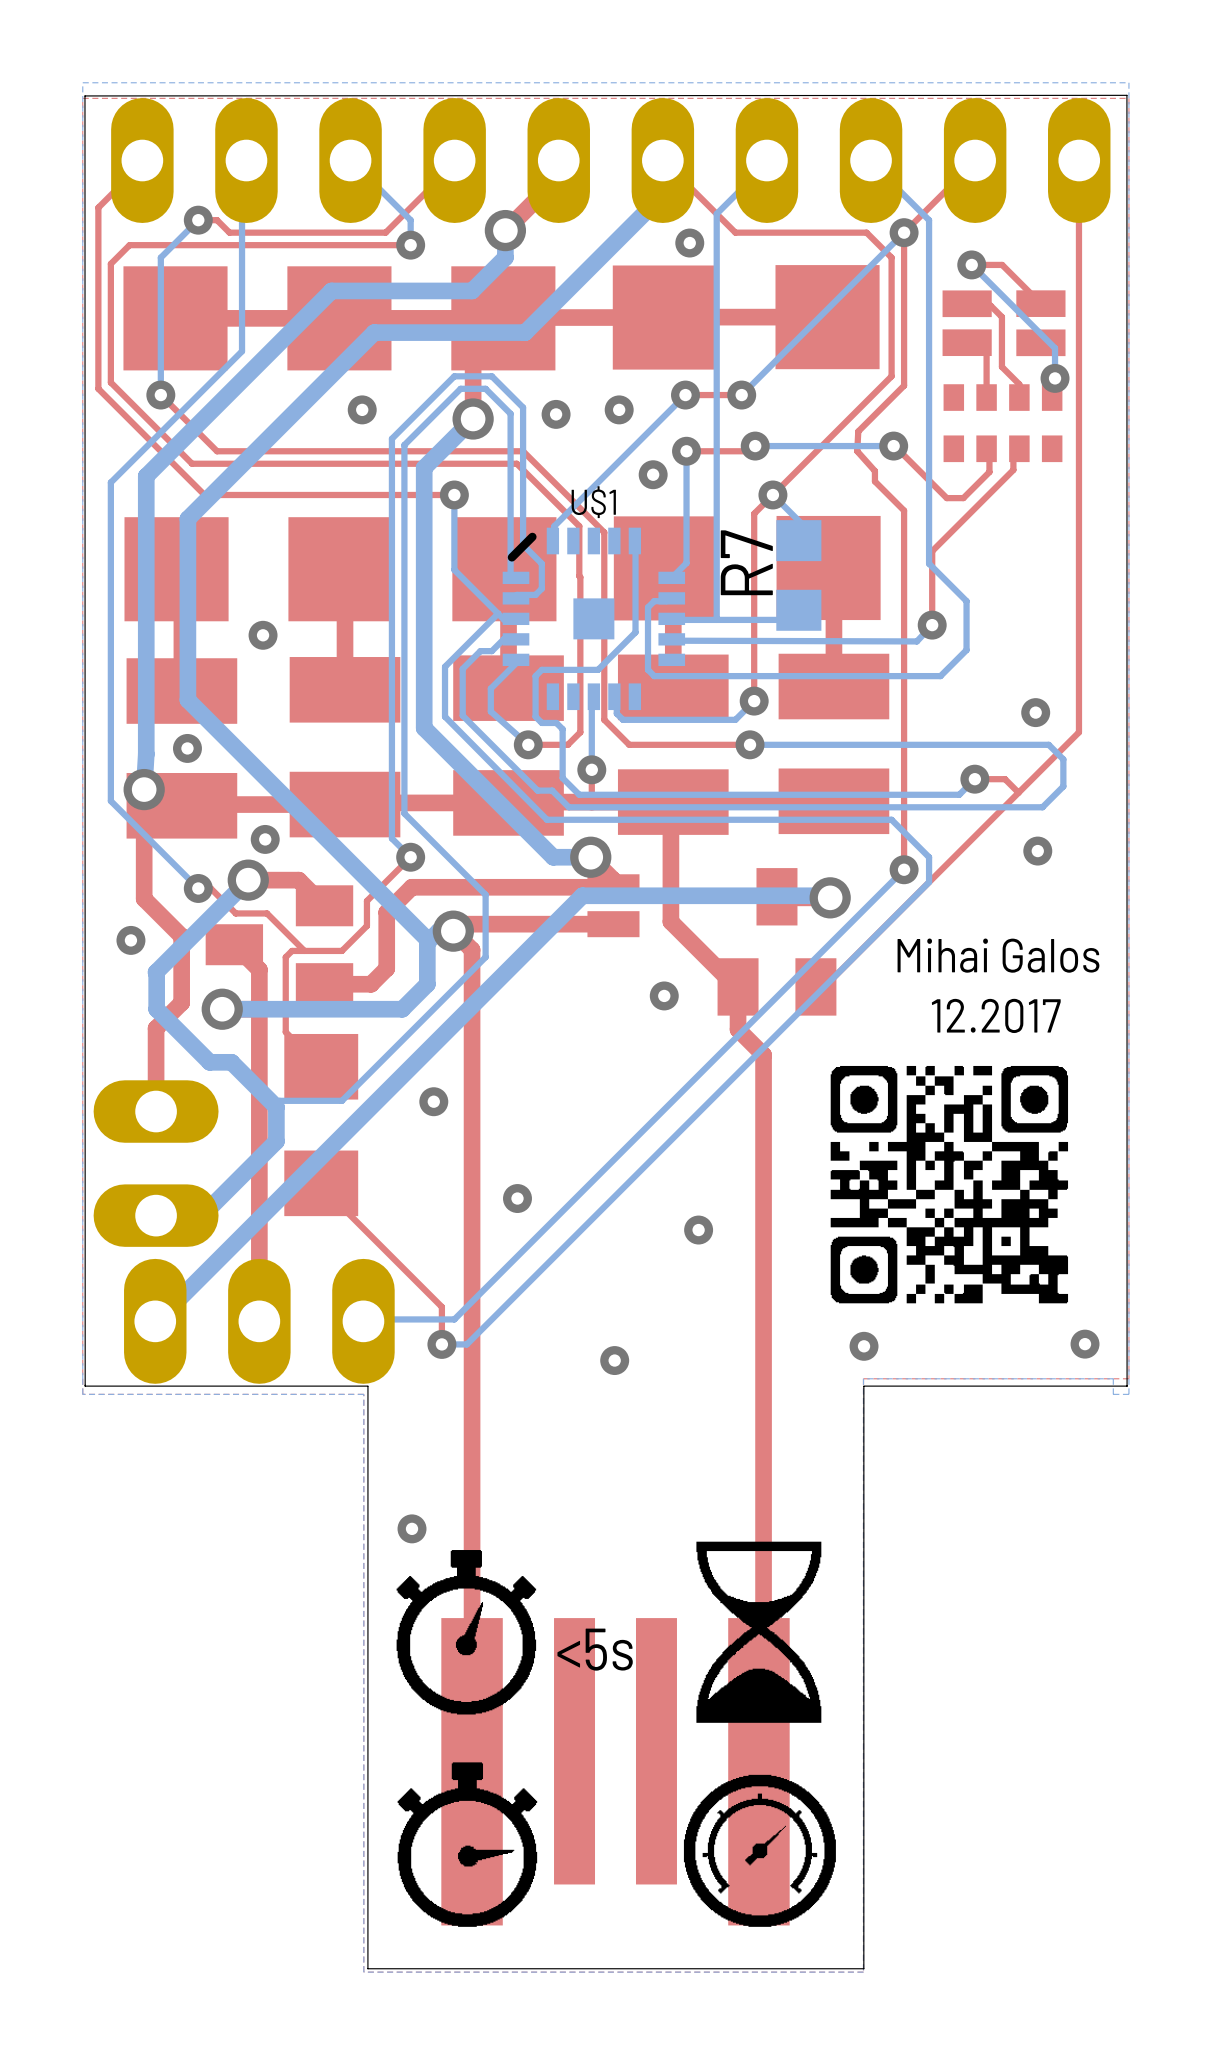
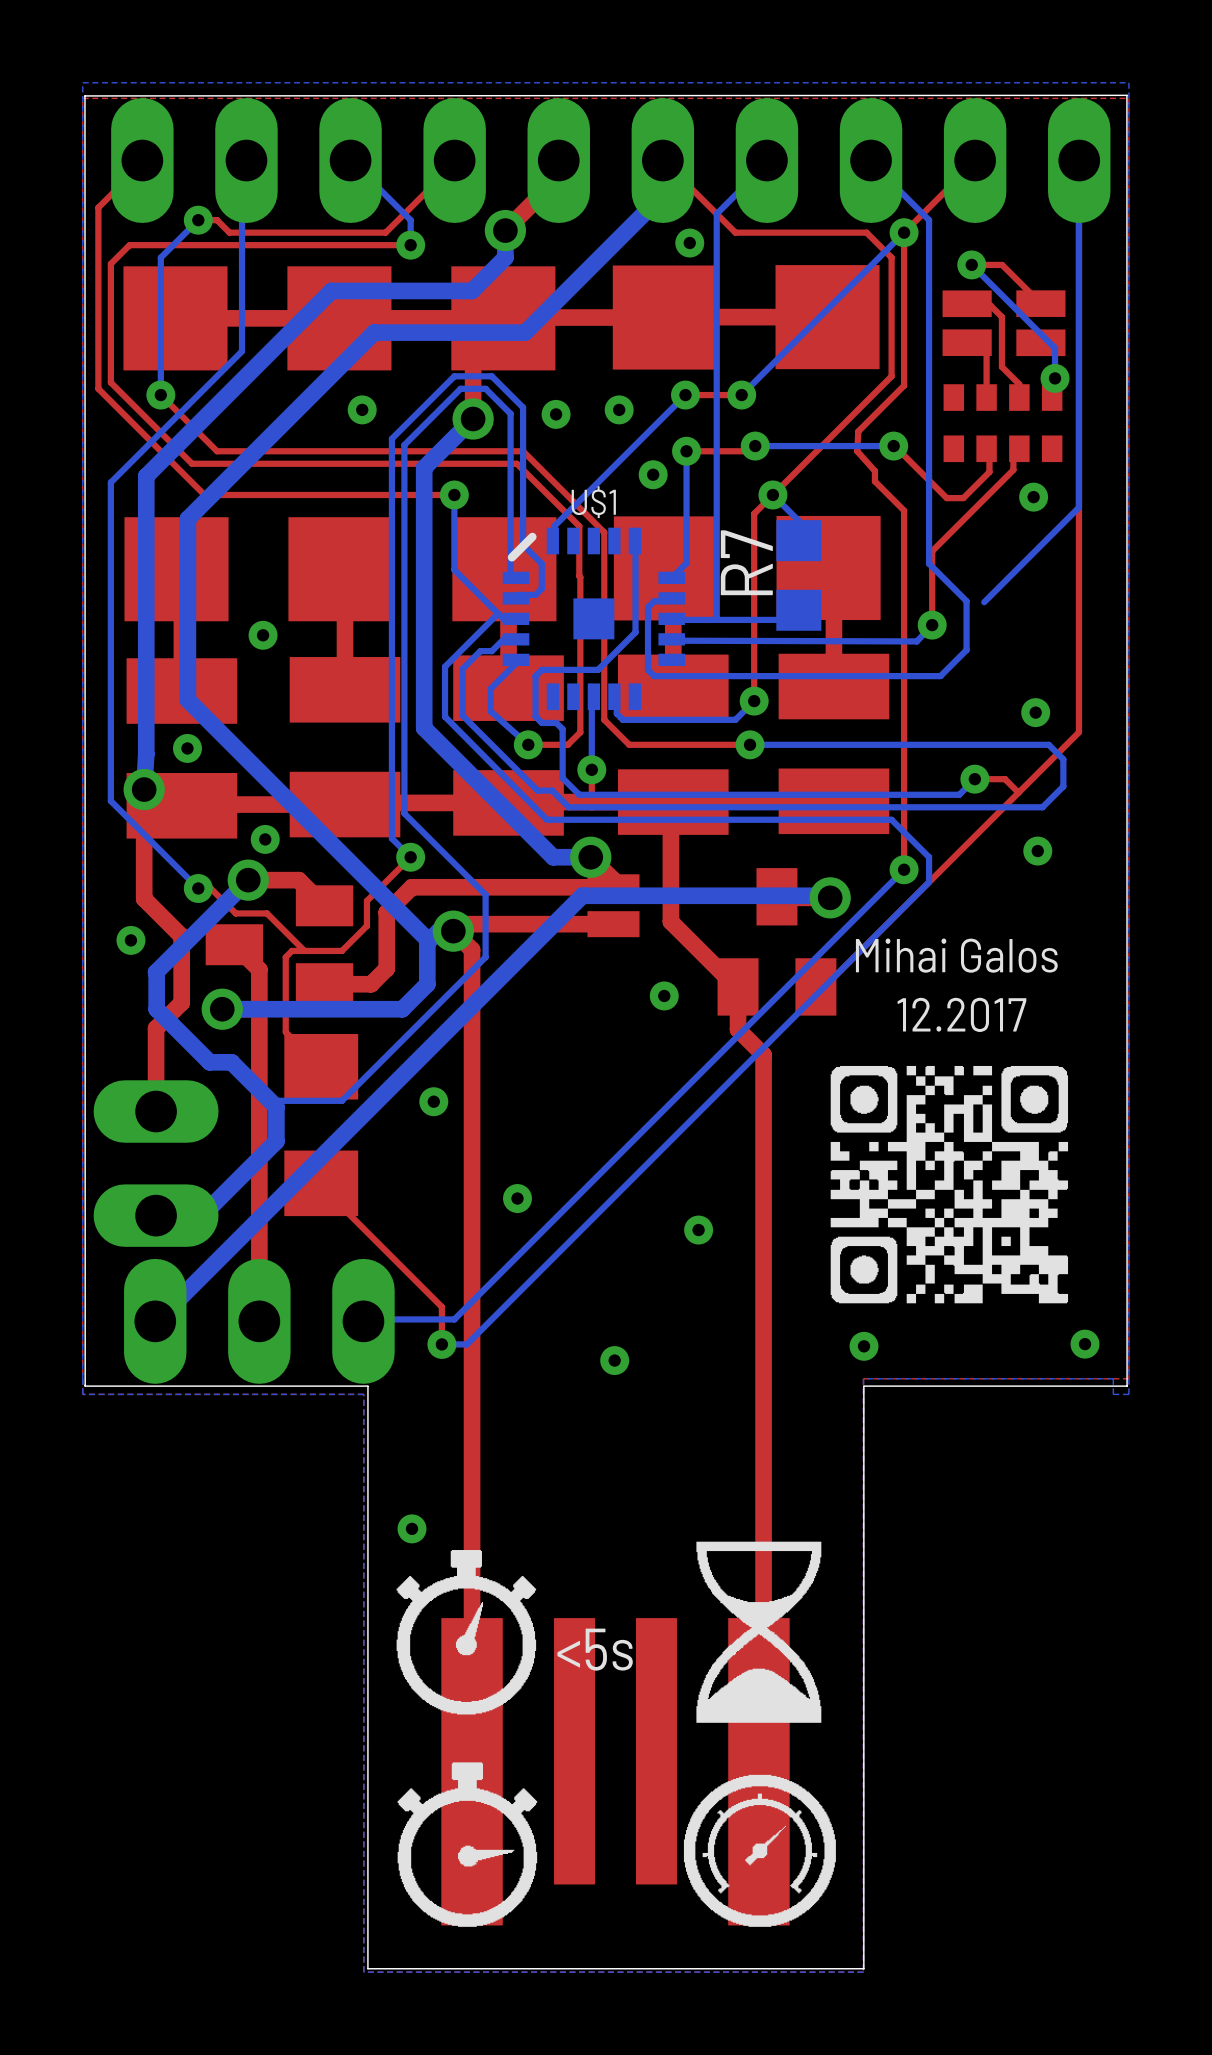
bottom track: none -> (1078, 163) (1078, 507) (984, 602)
via: none -> (1033, 497)
text position: Mihai Galos (998, 955) -> Mihai Galos (956, 955)
text position: 12.2017 (996, 1015) -> 12.2017 (961, 1014)

